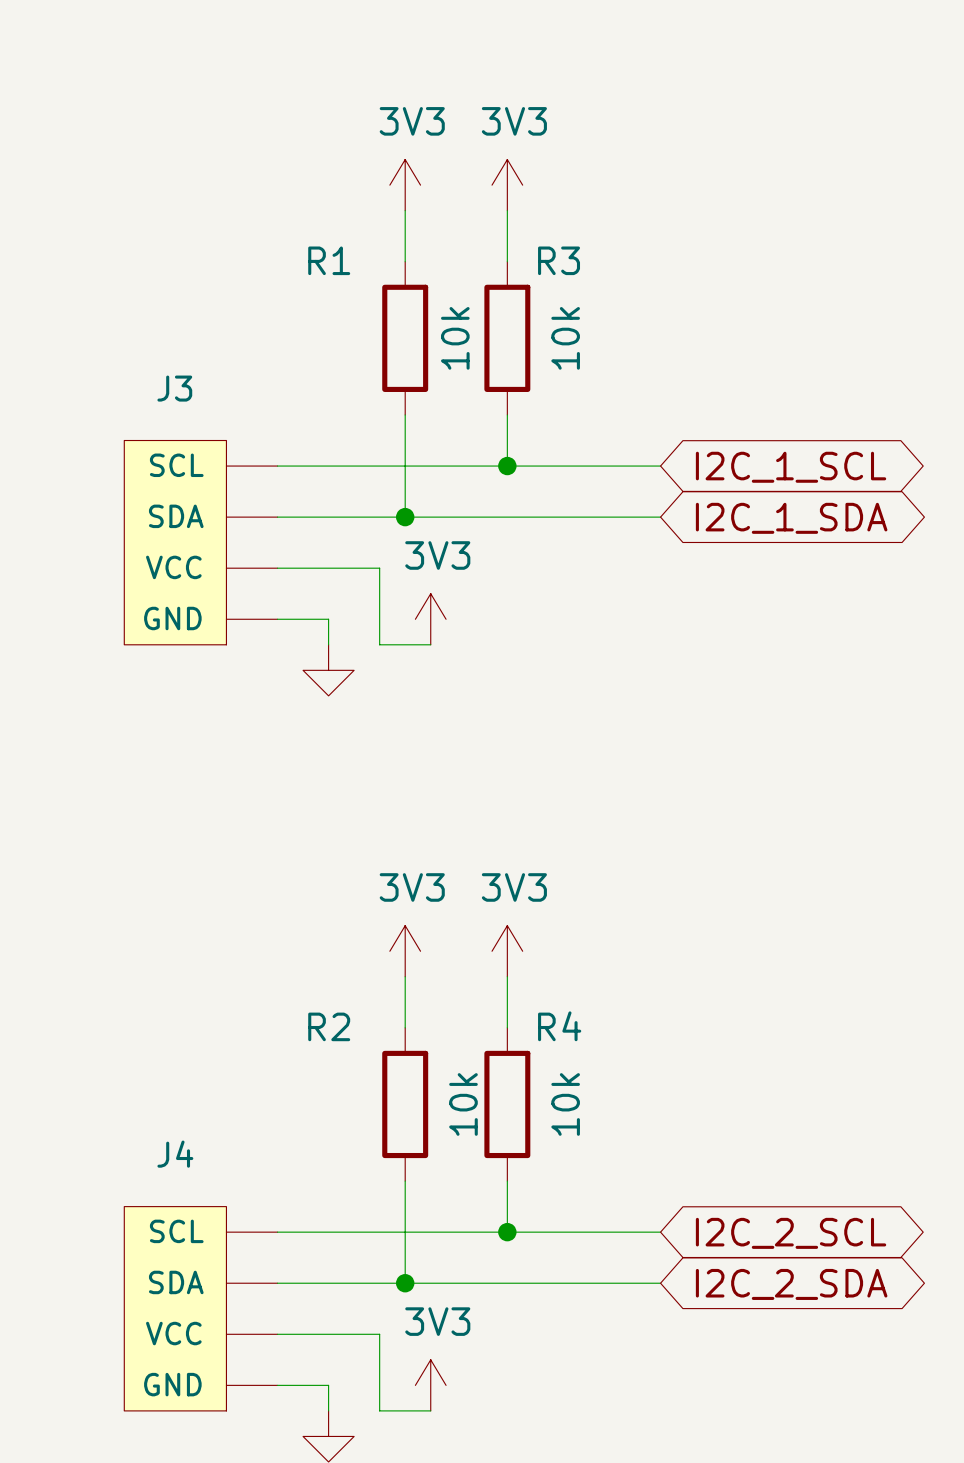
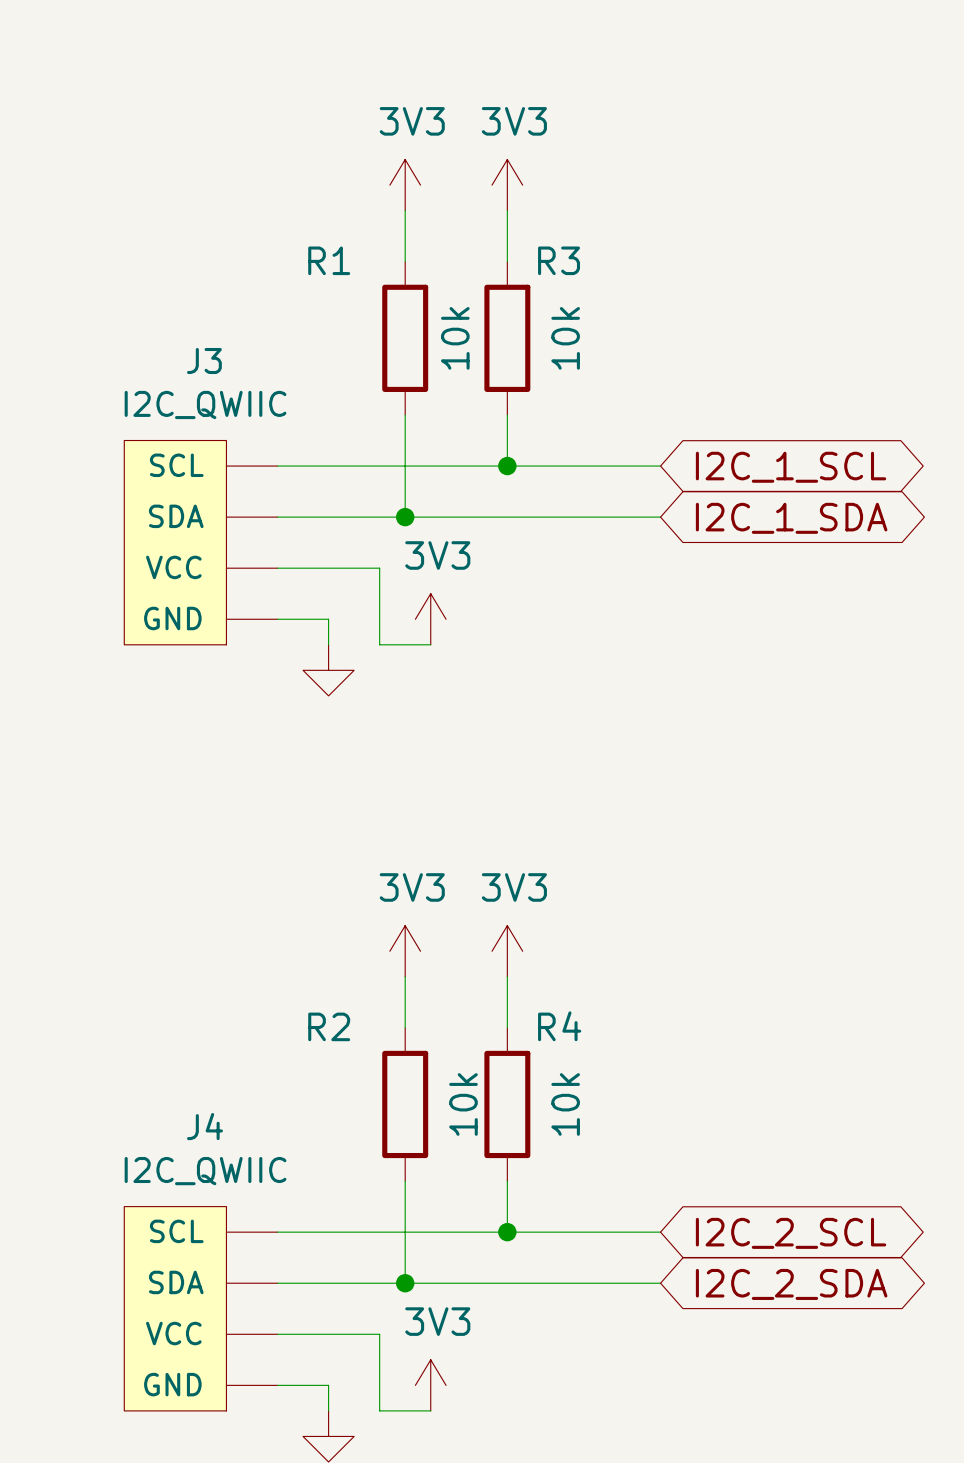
J3 name position: J3 (174, 388) -> J3 (204, 360)
J3 value: none -> I2C_QWIIC (205, 404)
J4 name position: J4 (175, 1154) -> J4 (204, 1126)
J4 value: none -> I2C_QWIIC (205, 1171)

